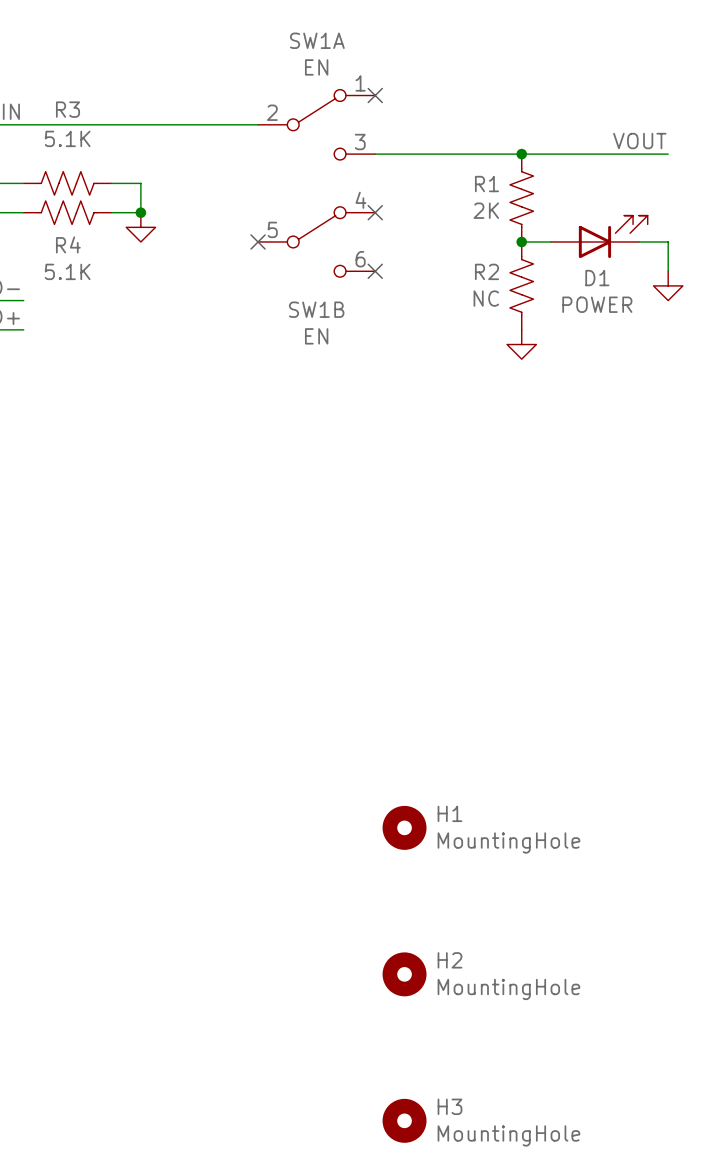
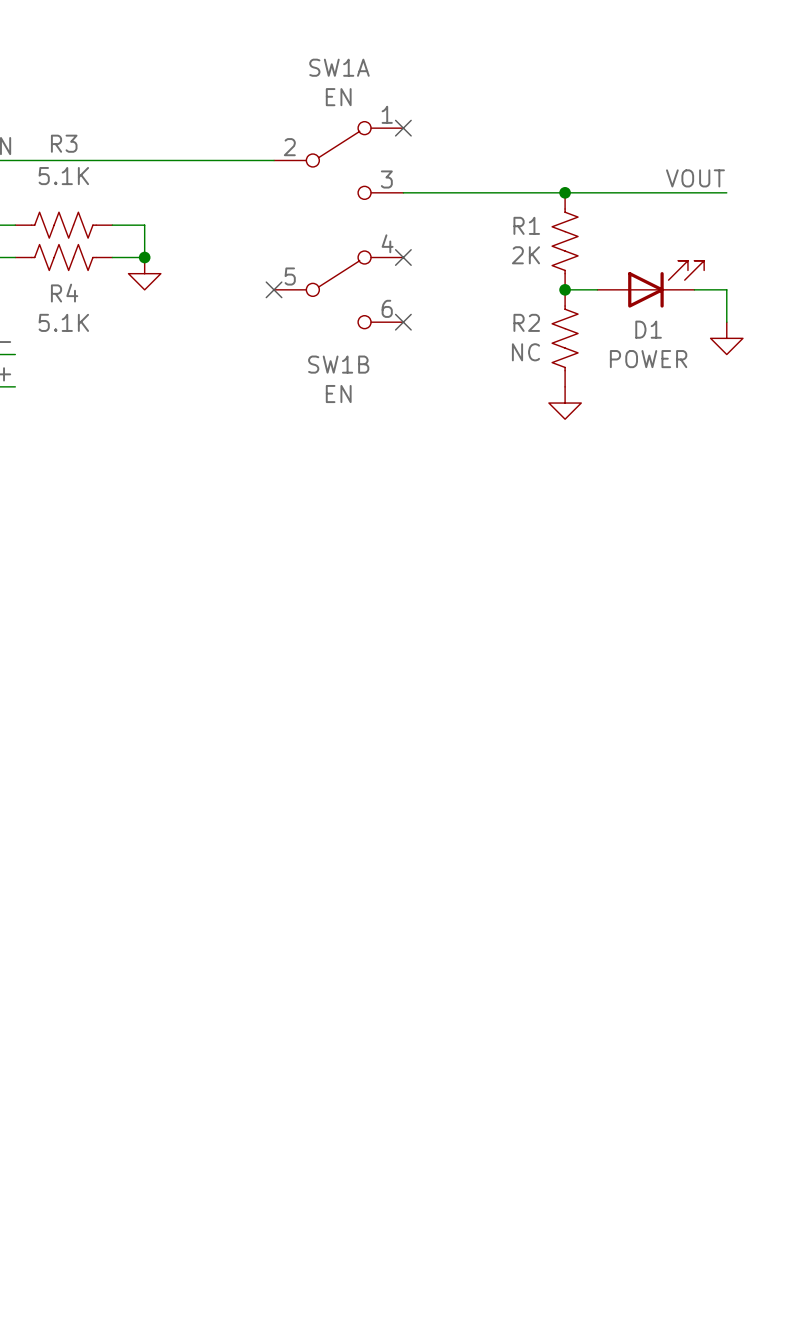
H1: MountingHole (404, 827) -> none
H2: MountingHole (404, 974) -> none
H3: MountingHole (404, 1120) -> none

